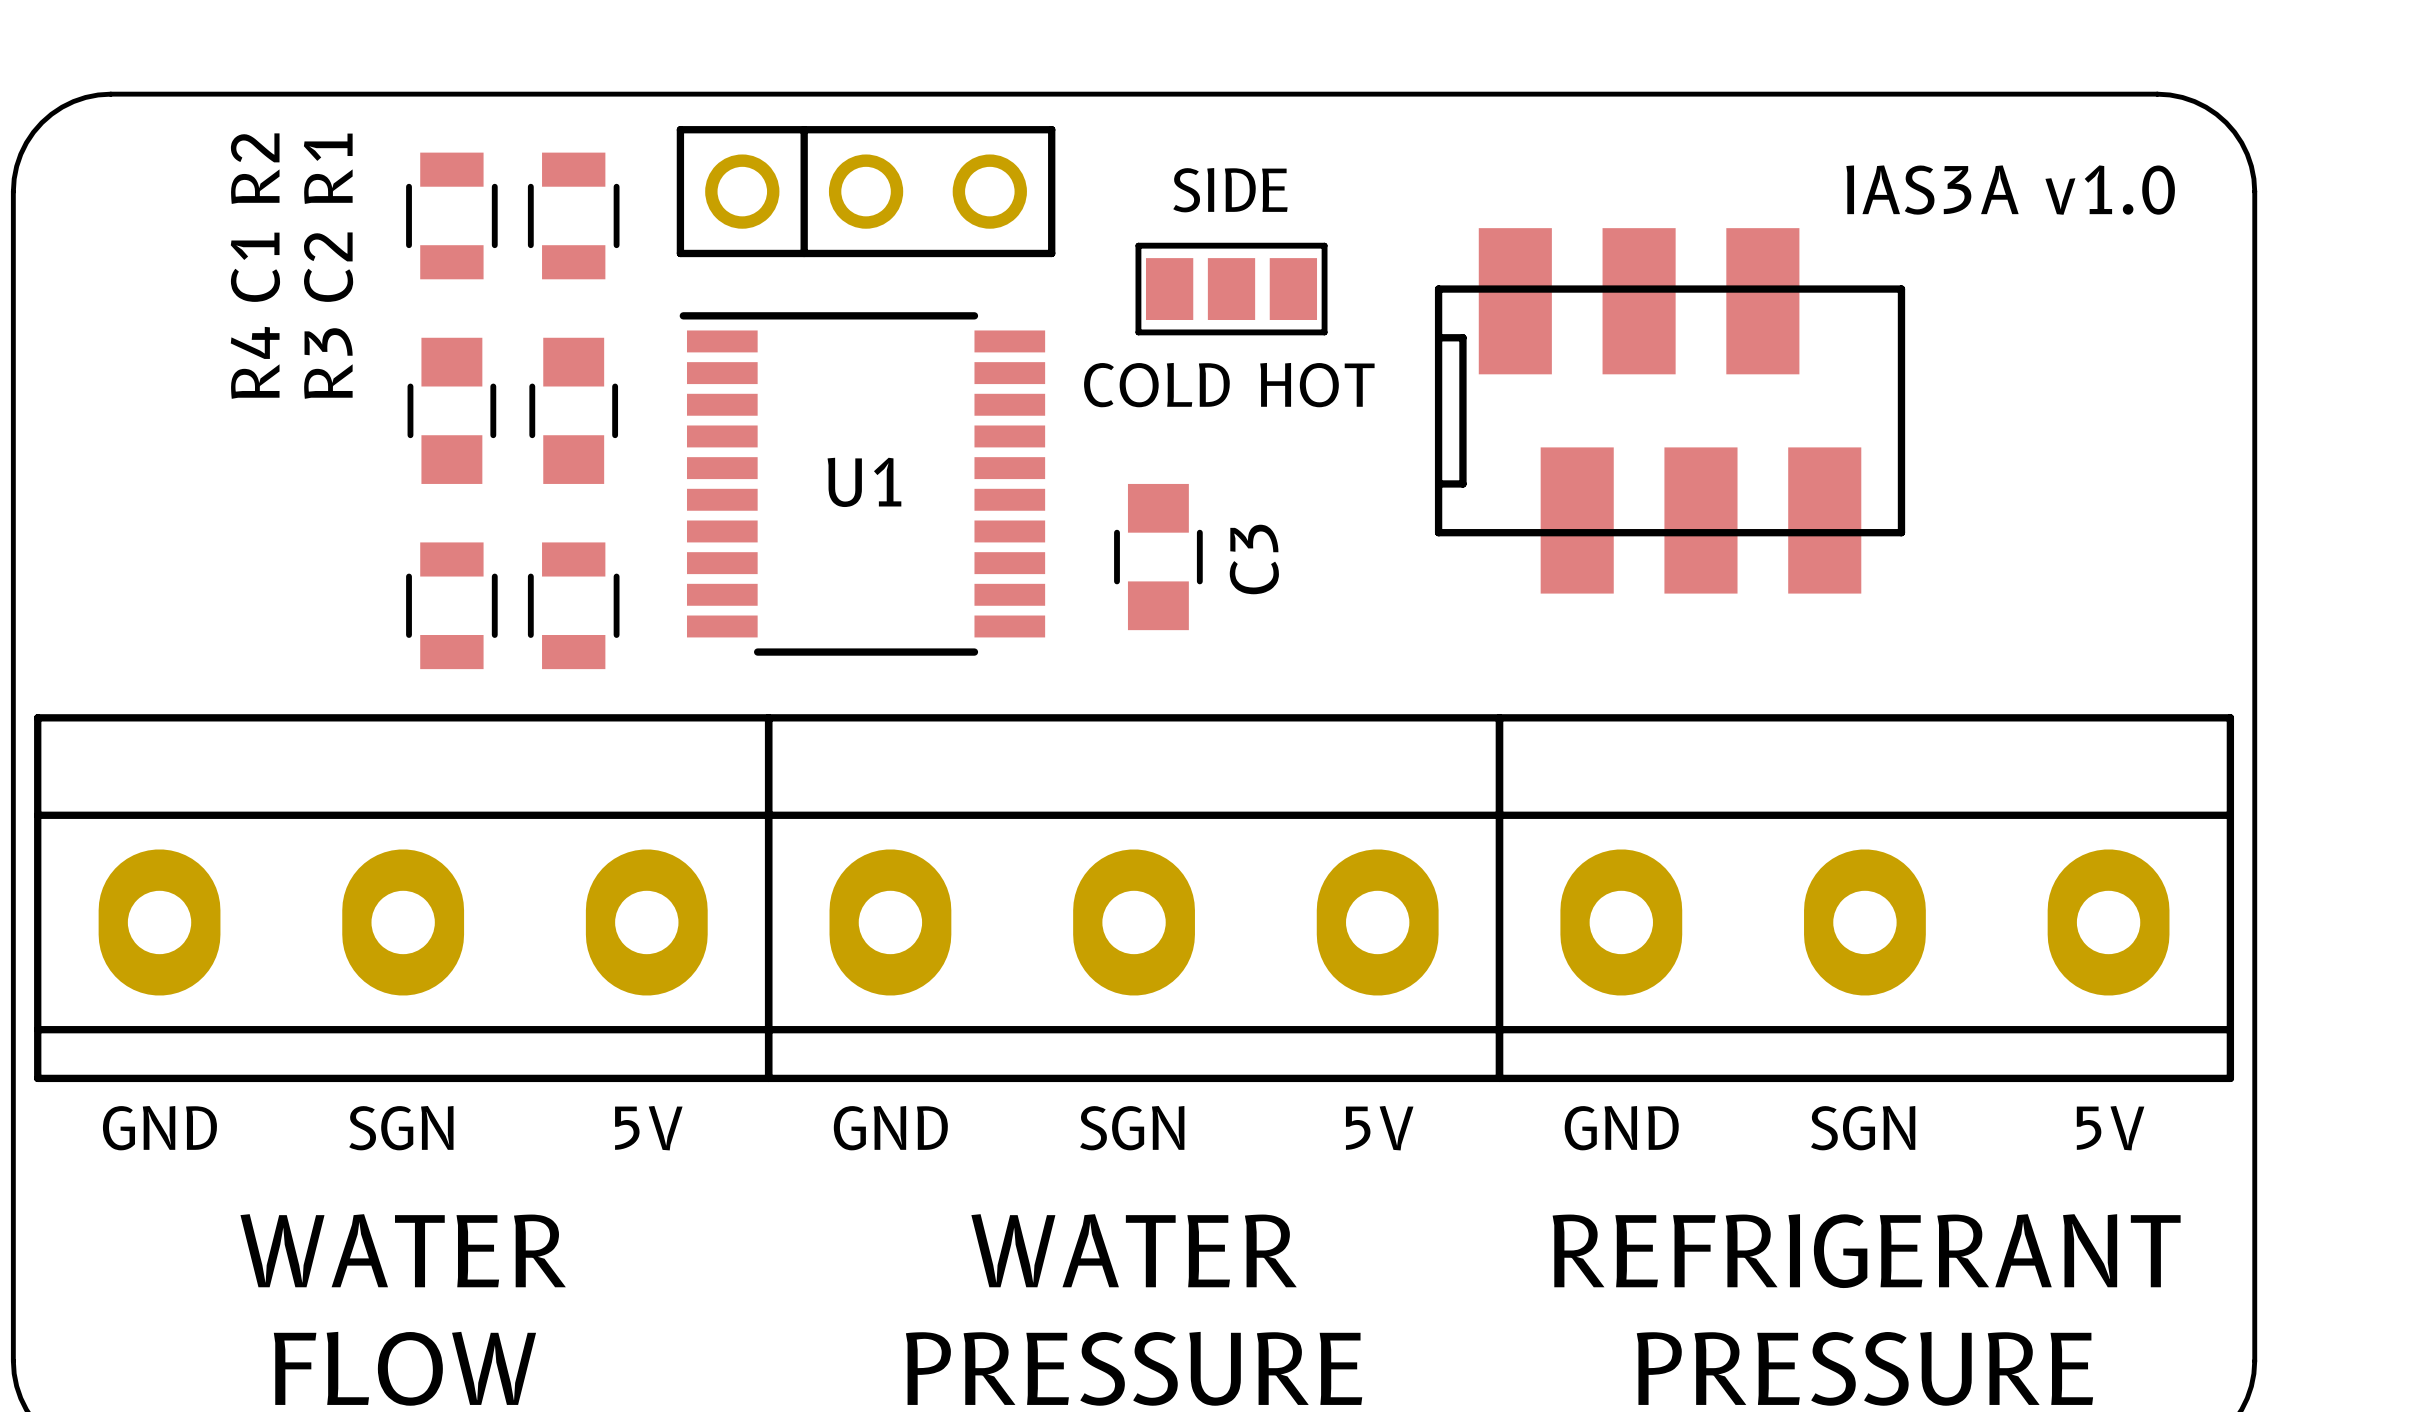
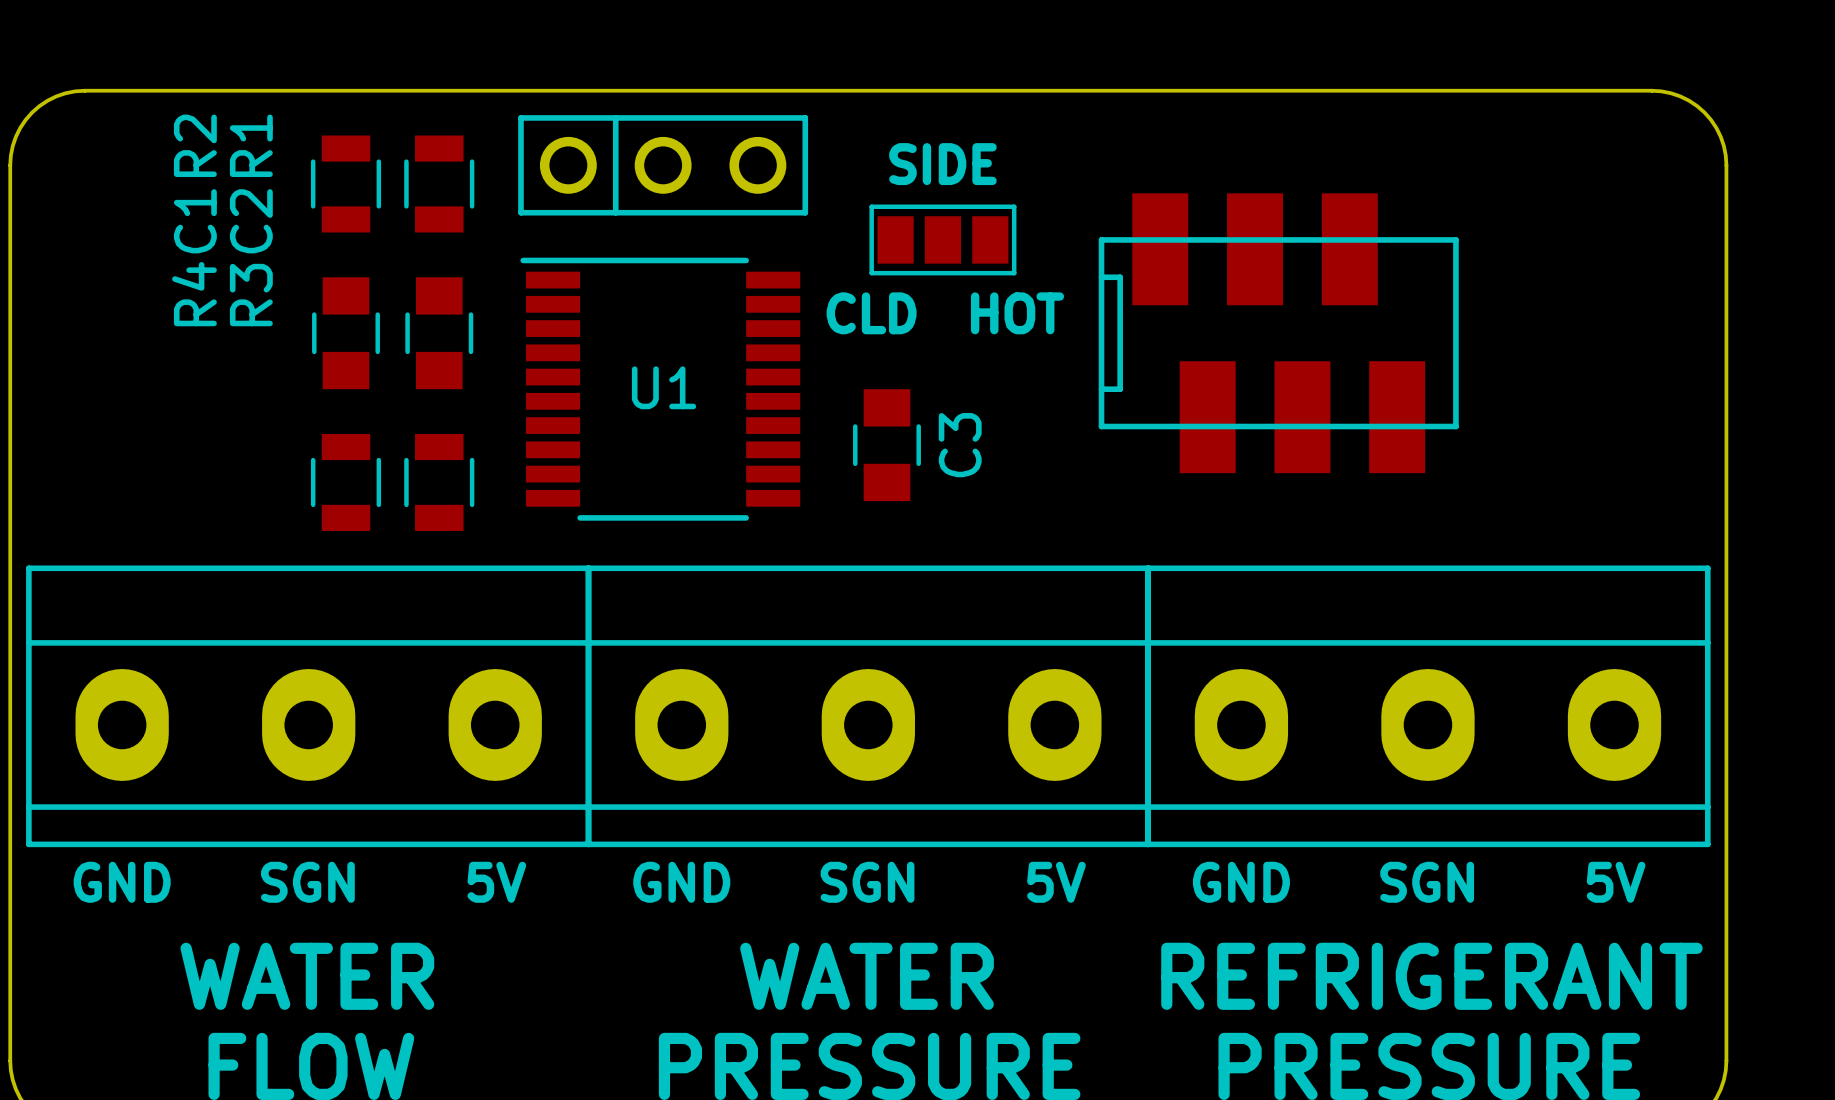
text: IAS3A v1.0 (2010, 190) -> none
text: COLD (1156, 385) -> CLD (871, 313)

